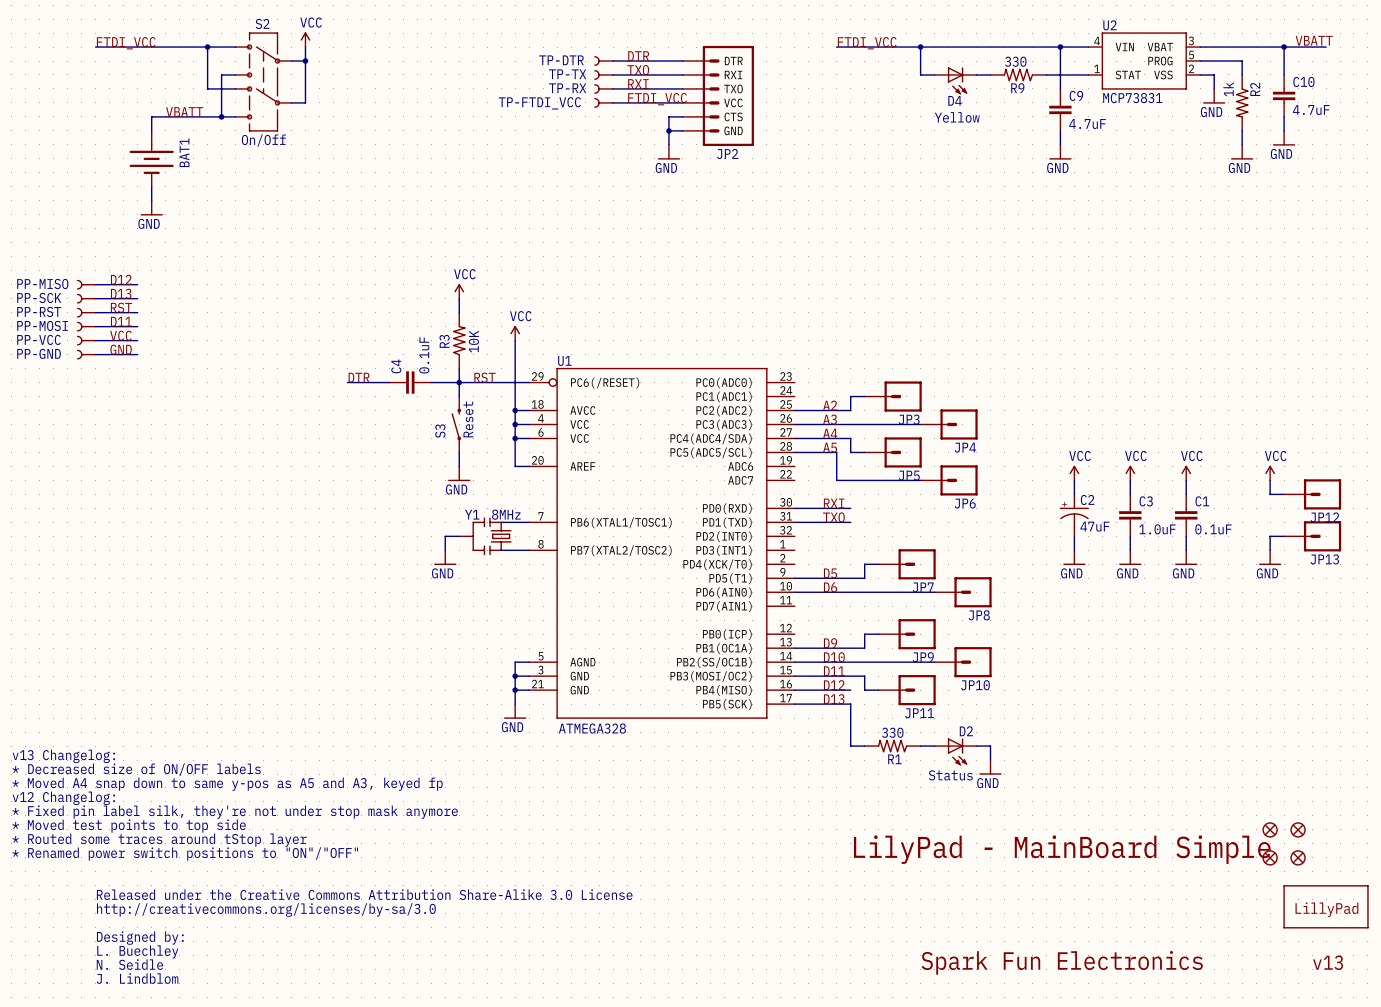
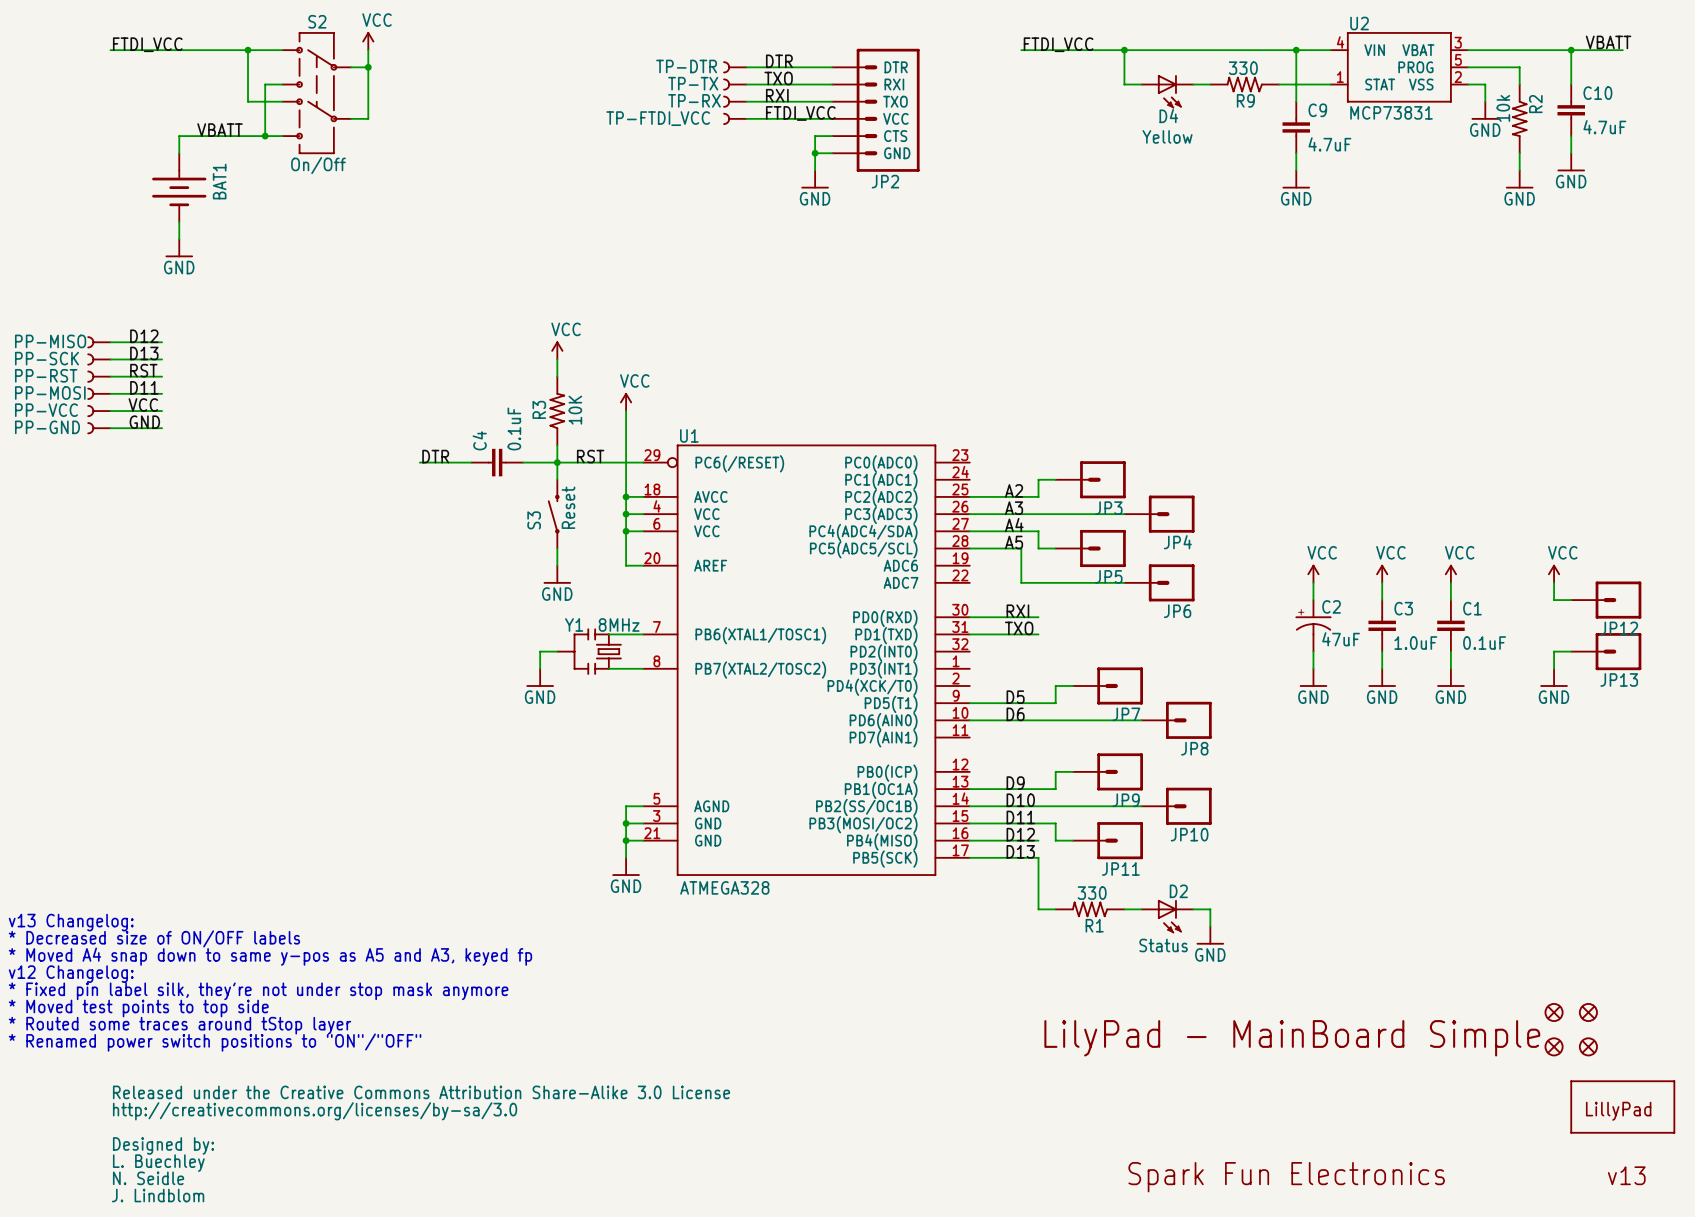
R2 value: 1k (1228, 89) -> 10k (1503, 108)

